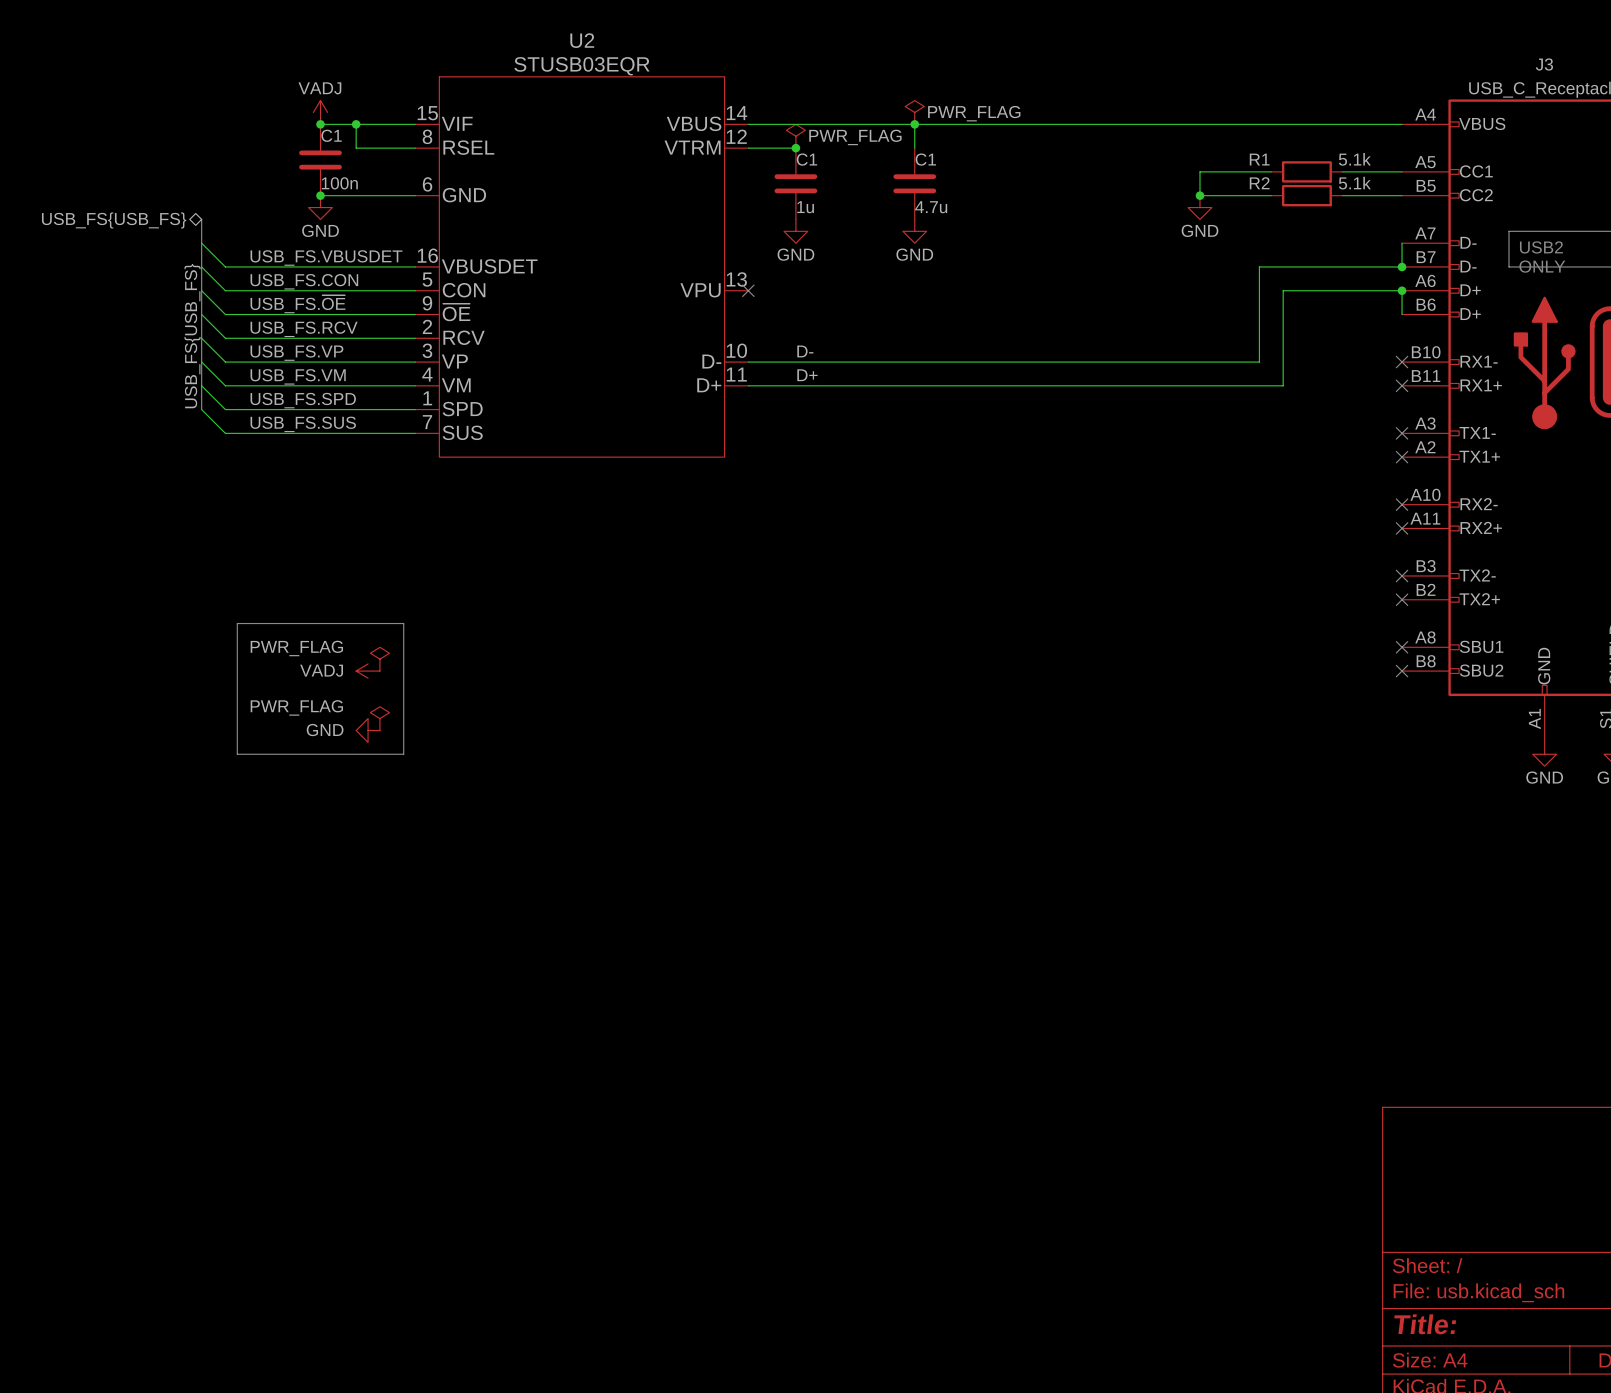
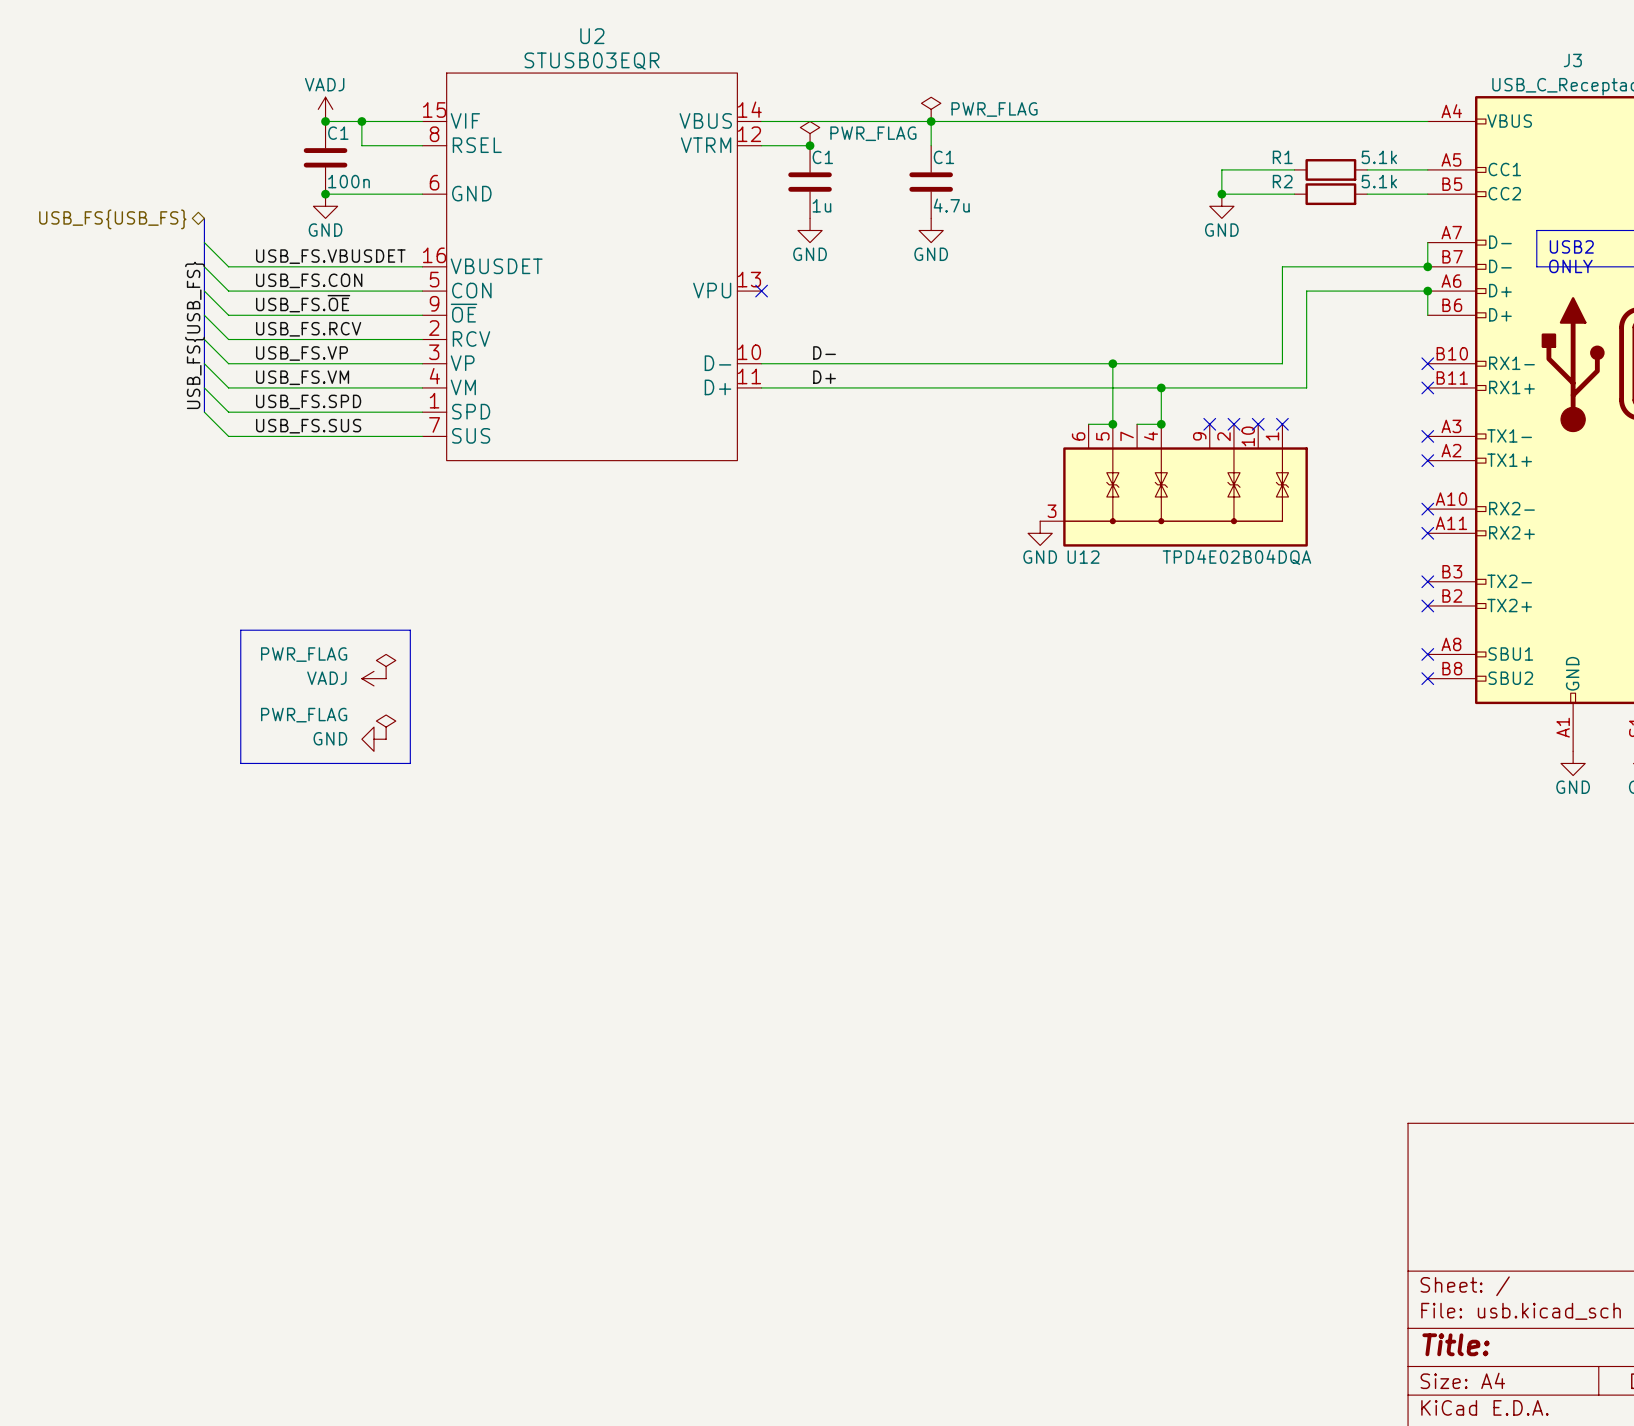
wire: none -> (1112, 363) (1112, 424) (1088, 424)
junction: none -> (1112, 363)
wire: none -> (1161, 387) (1161, 424) (1137, 424)
junction: none -> (1161, 387)
junction: none -> (1112, 424)
junction: none -> (1161, 424)
no-connect mark: none -> (1209, 424)
no-connect mark: none -> (1233, 424)
no-connect mark: none -> (1258, 424)
no-connect mark: none -> (1282, 424)
U12: none -> TPD4E02B04DQA (1174, 485)
power symbol: none -> GND (1040, 533)

